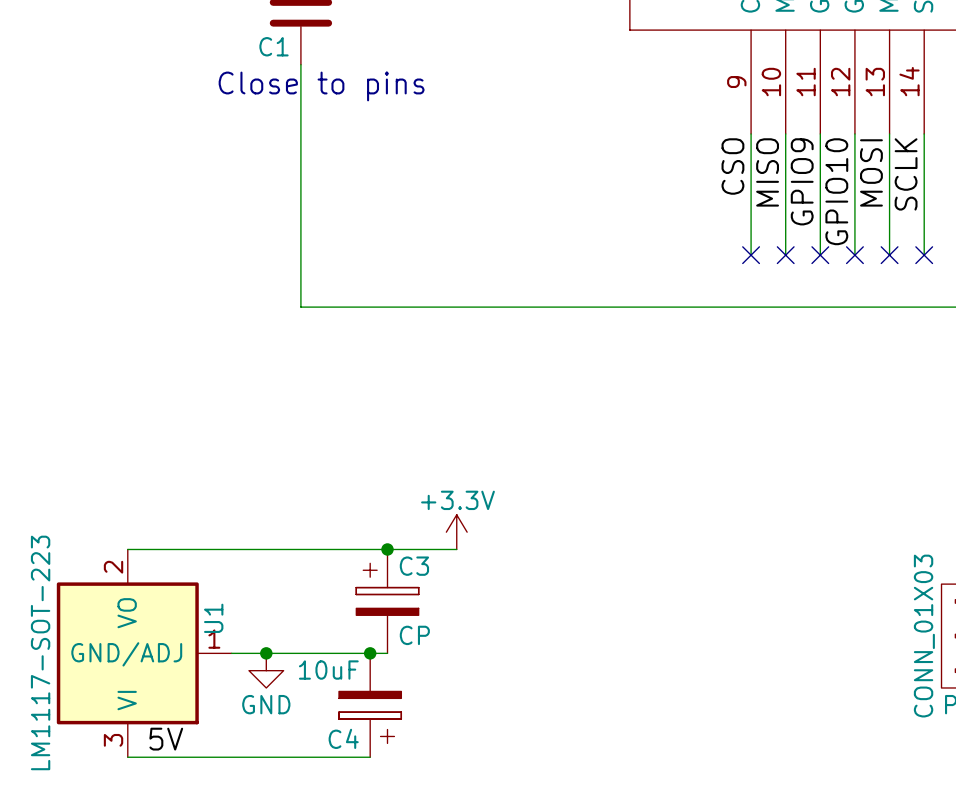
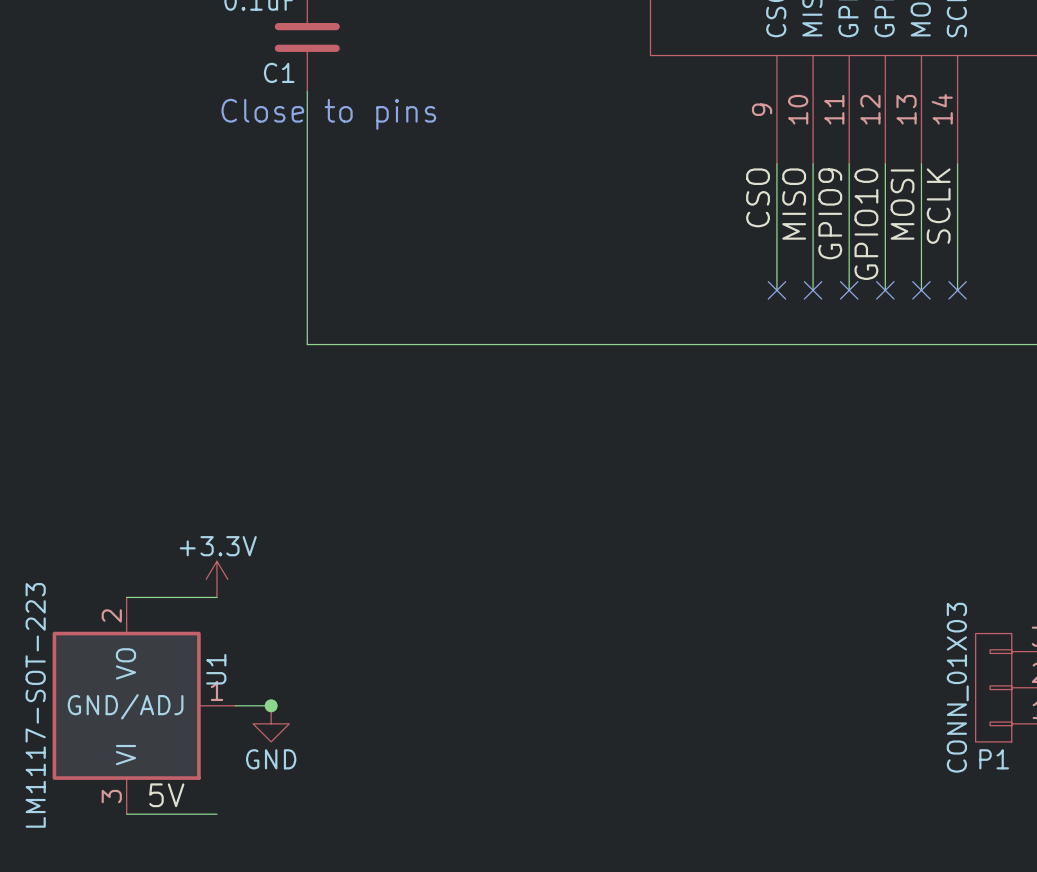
power symbol position: +3.3V (456, 532) -> +3.3V (216, 579)
wire: (214, 549) (456, 549) -> none
junction: (387, 549) -> none
C3: CP (387, 601) -> none
wire: (266, 653) (387, 653) -> none
junction: (370, 653) -> none
C4: 10uF (370, 705) -> none
wire: (214, 757) (370, 757) -> none

